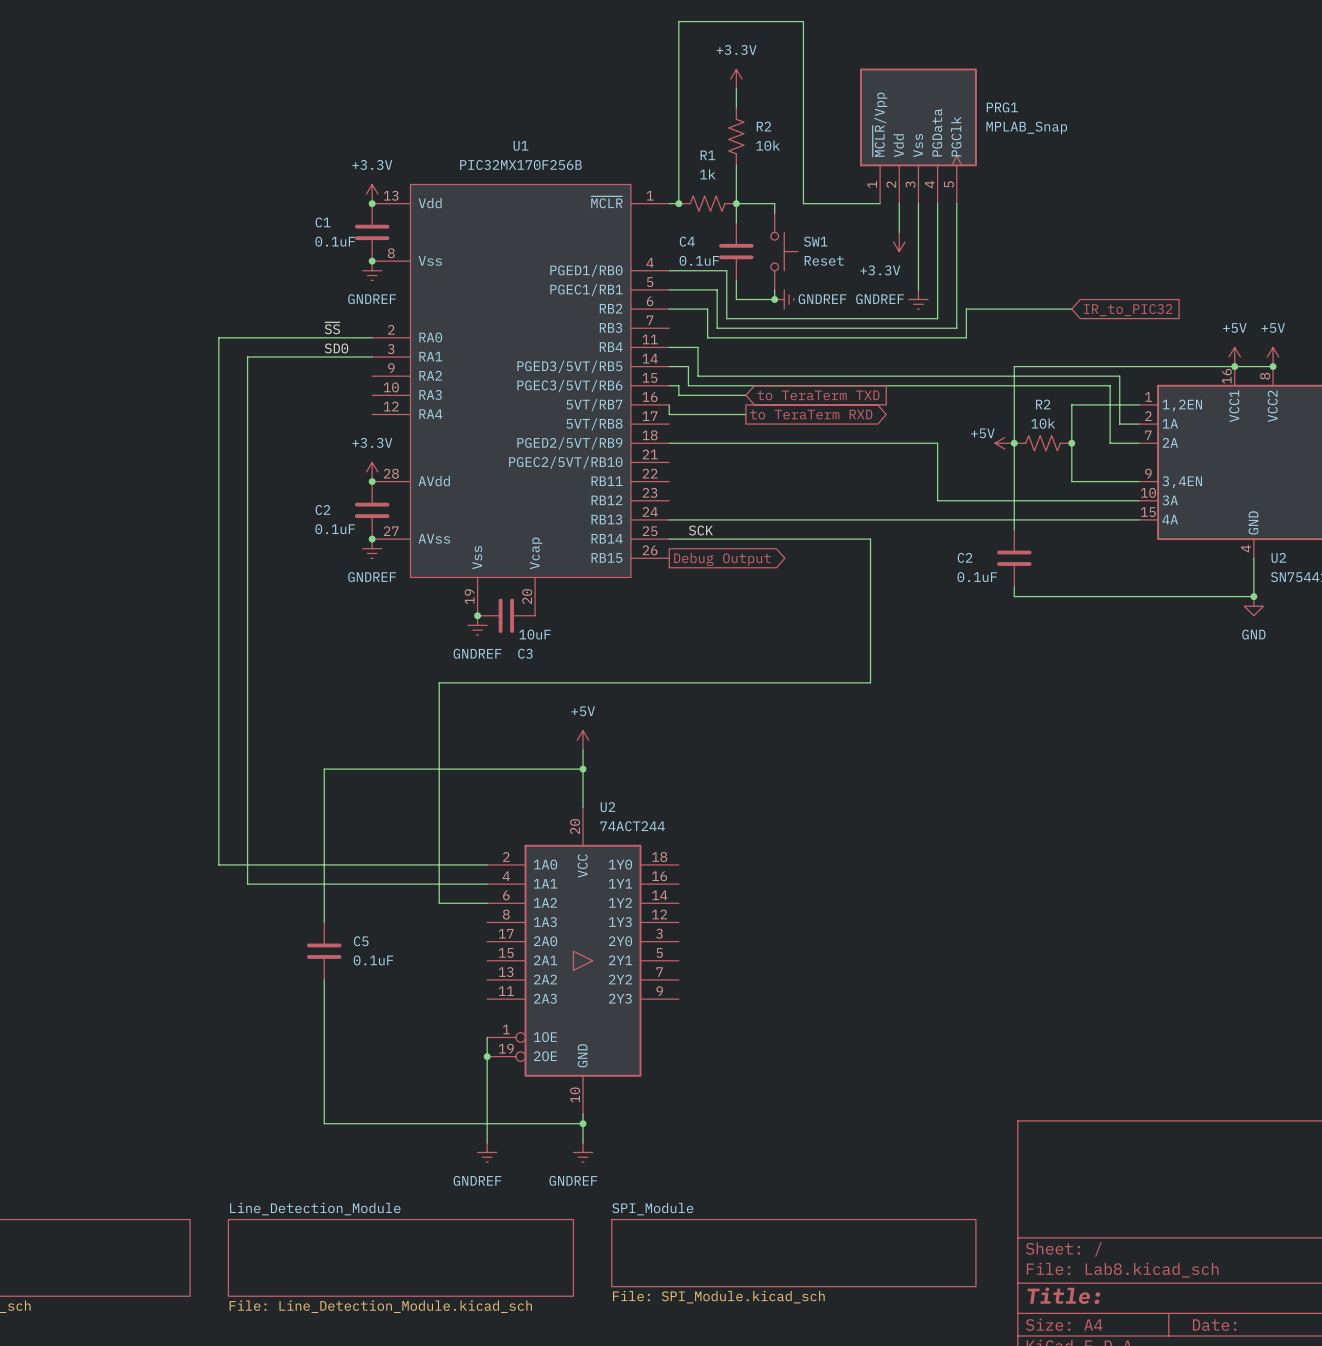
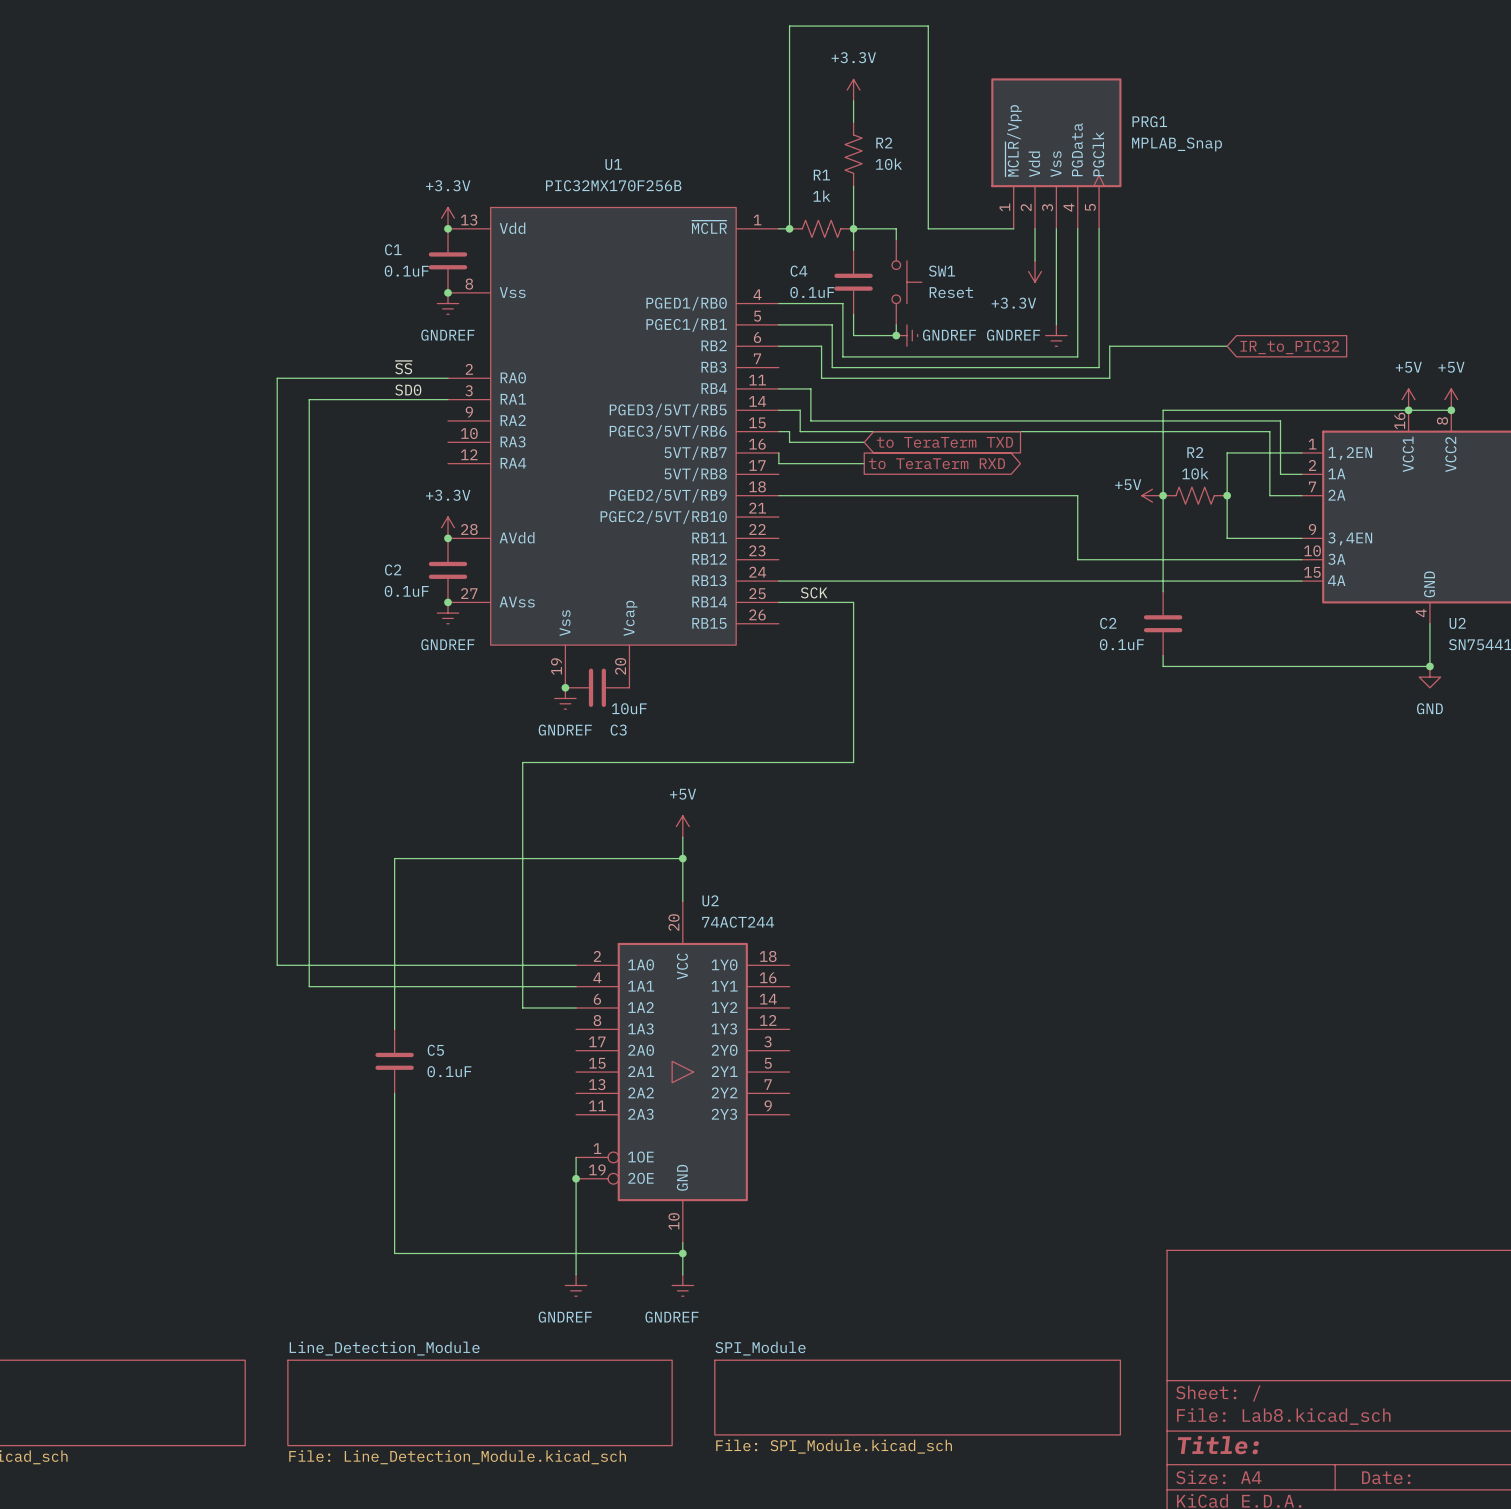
wire: (736, 539) (870, 539) (870, 682) (736, 682) -> (853, 602) (853, 762)
global label: Debug Output (722, 559) -> none

